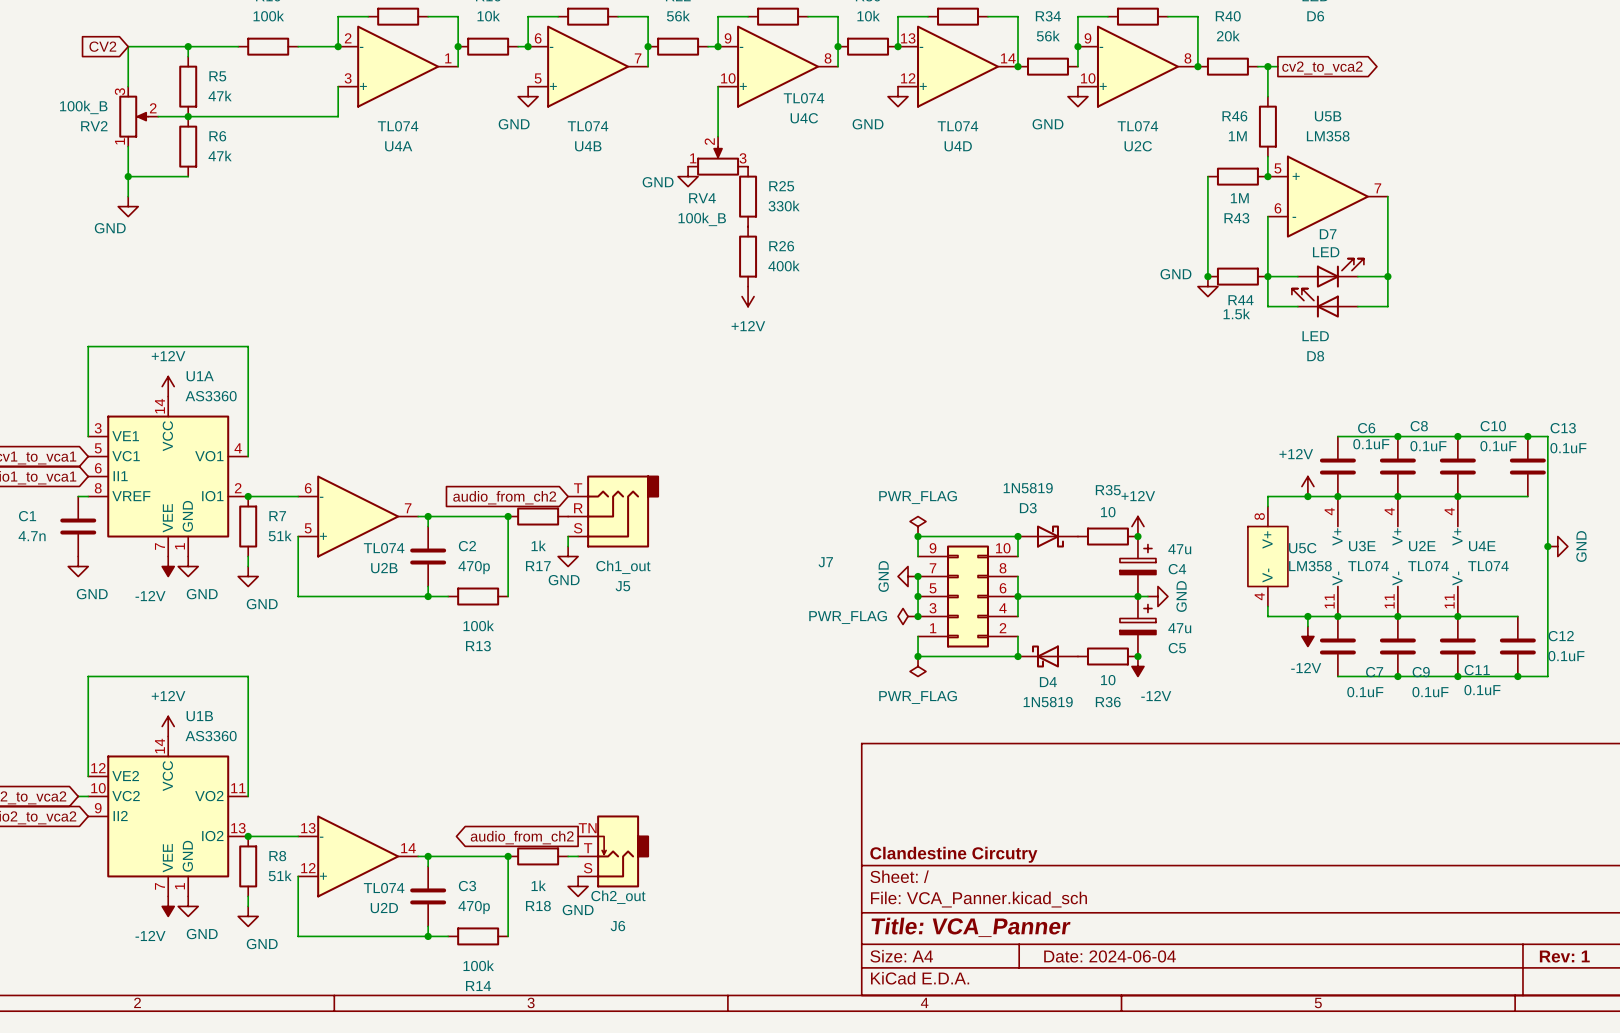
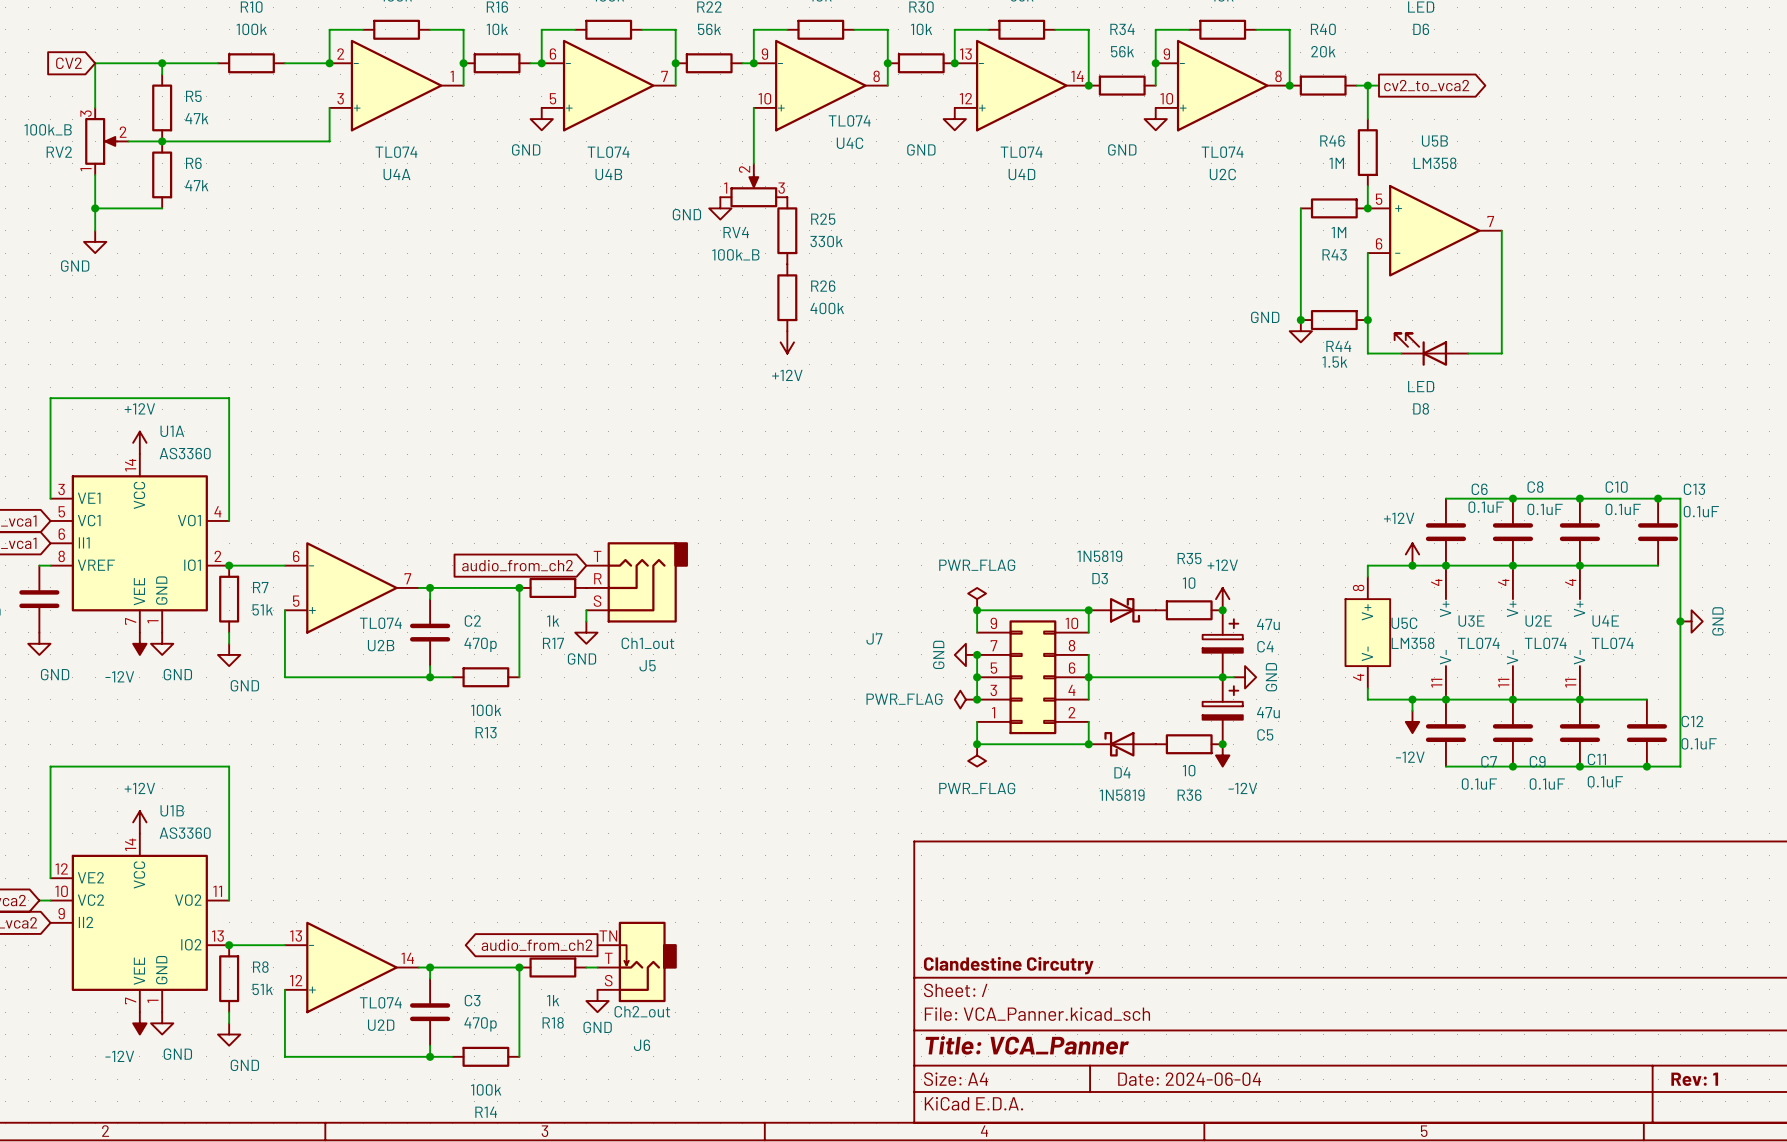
D7: LED (1330, 273) -> none
wire: (1267, 276) (1297, 276) -> none
wire: (1357, 276) (1387, 276) -> none
junction: (1387, 276) -> none

